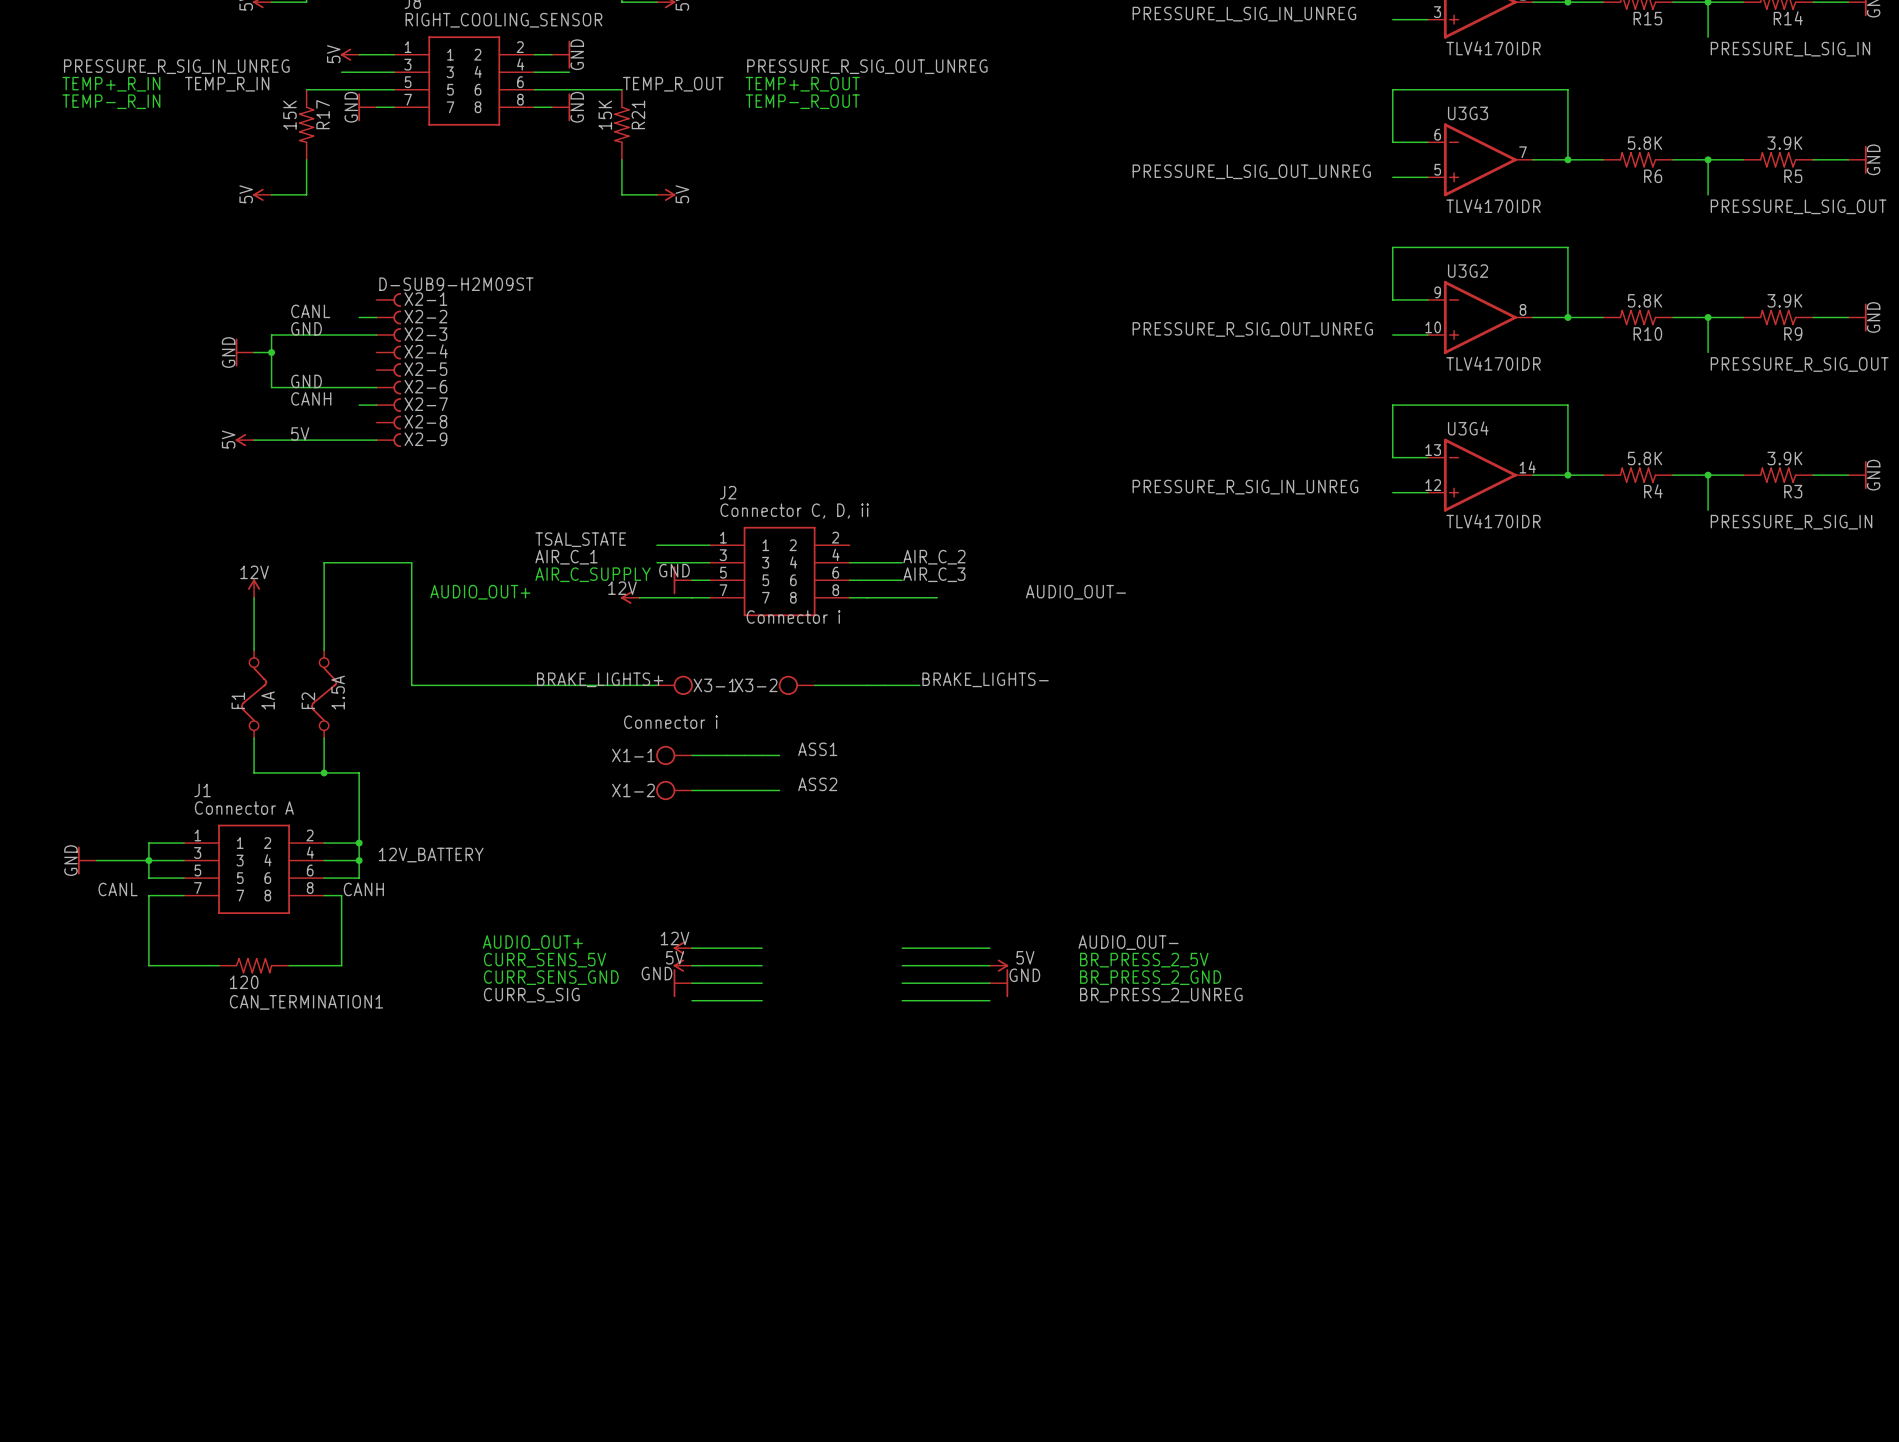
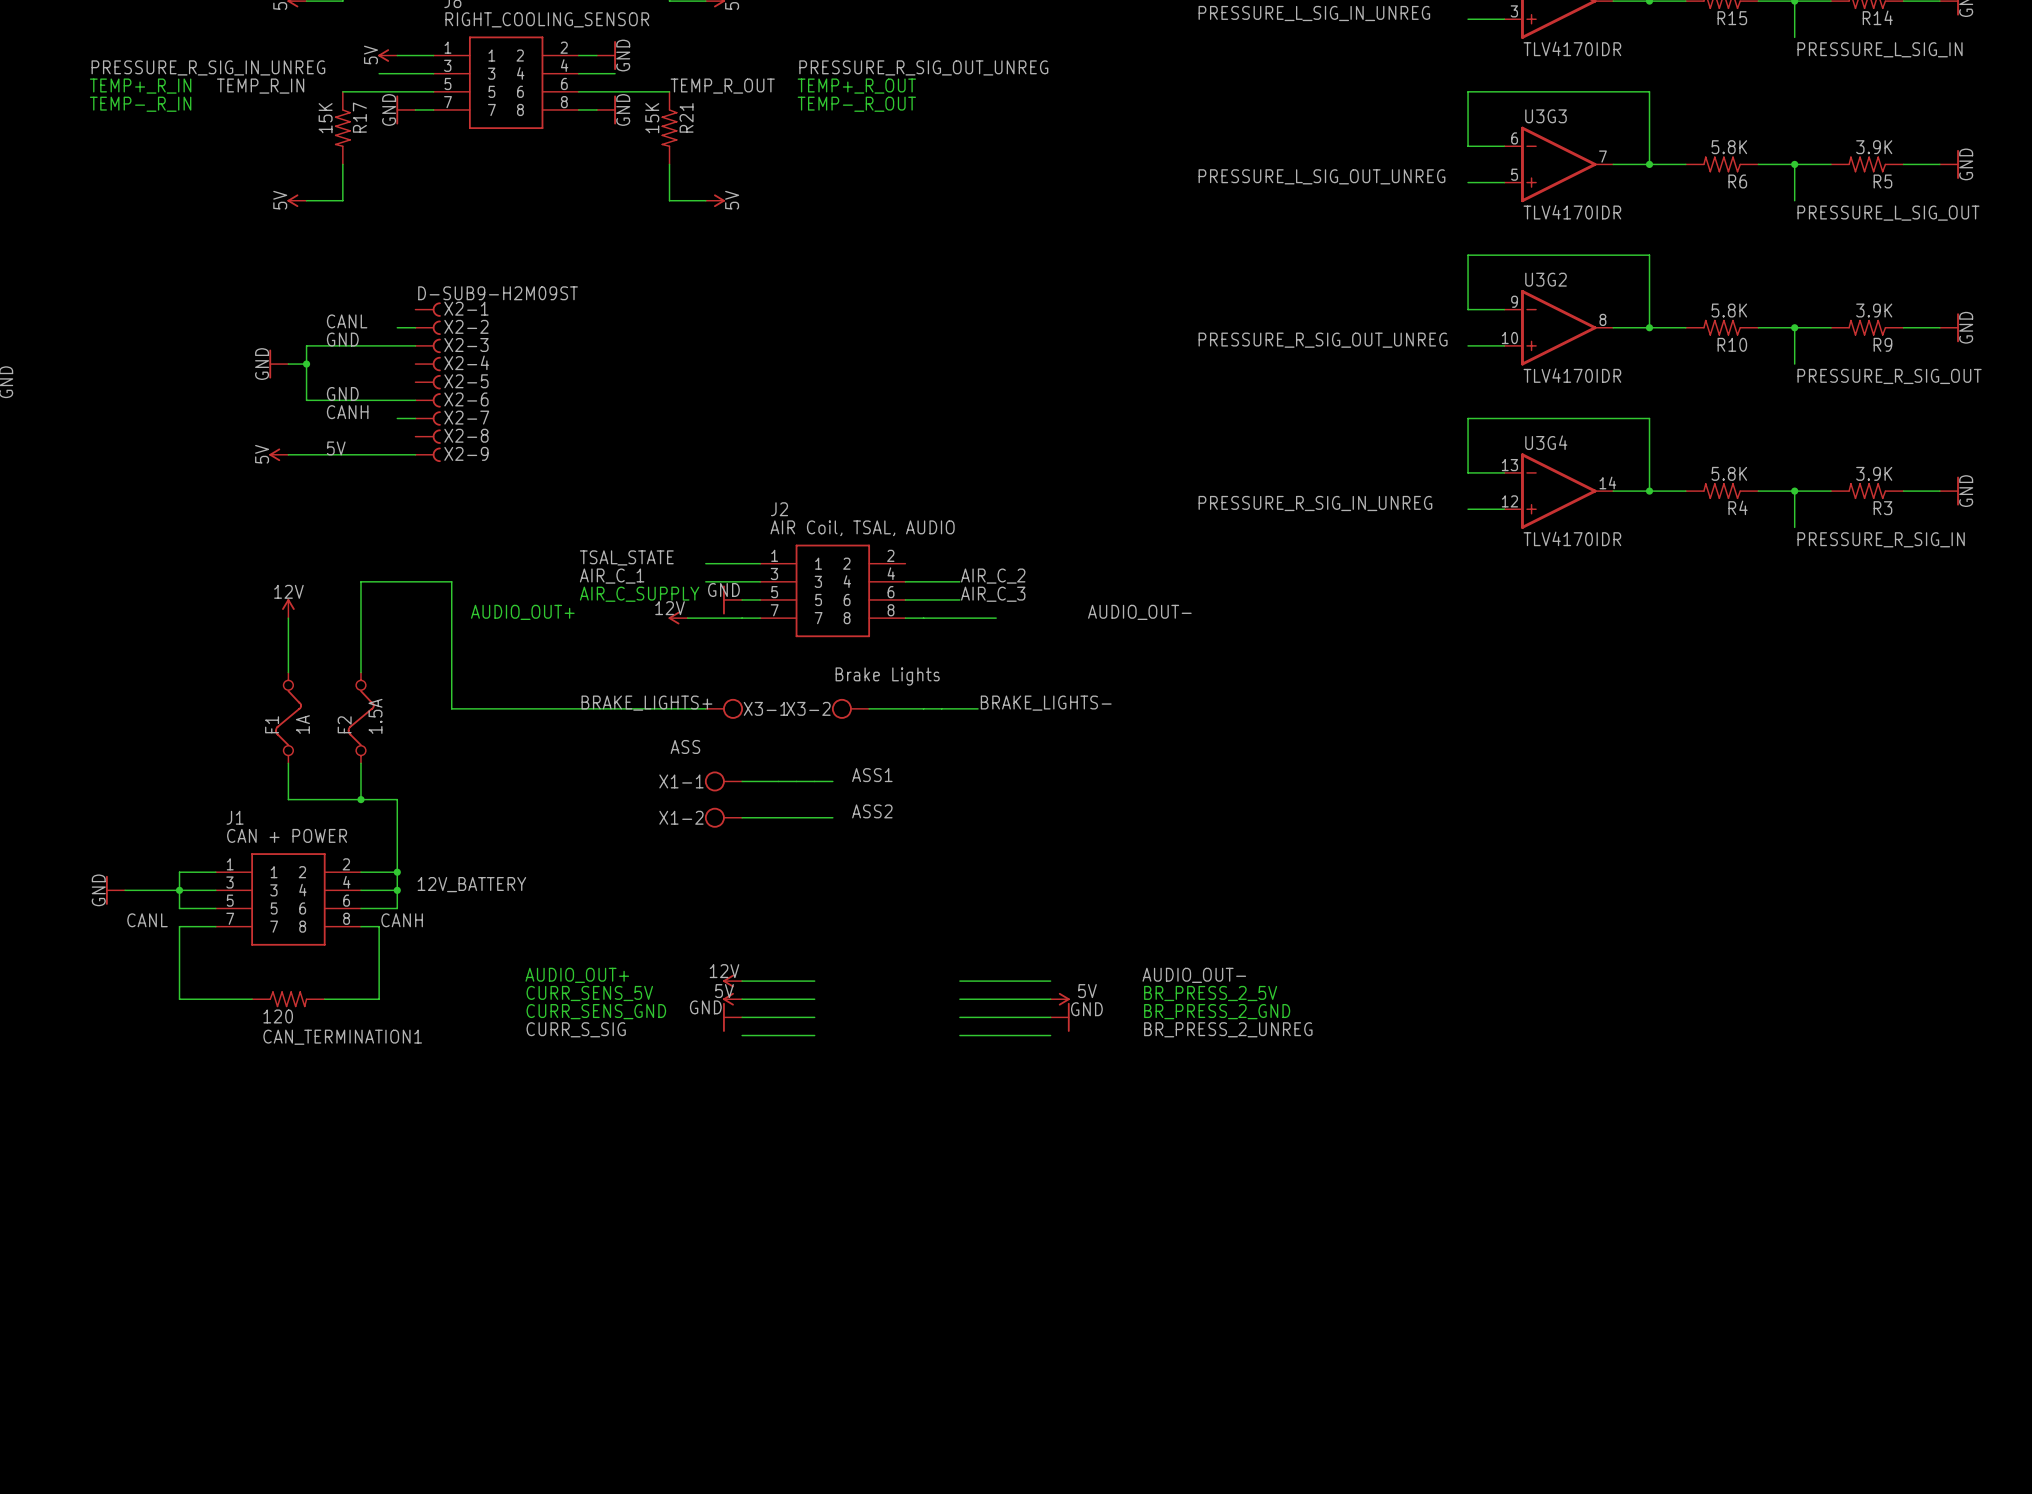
J2 value: Connector C, D, ii (794, 511) -> AIR Coil, TSAL, AUDIO (862, 528)
X3-2 value: Connector i (793, 617) -> Brake Lights (887, 676)
X1-2 value: Connector i (670, 722) -> ASS (685, 746)
J1 value: Connector A (244, 808) -> CAN + POWER (287, 835)

